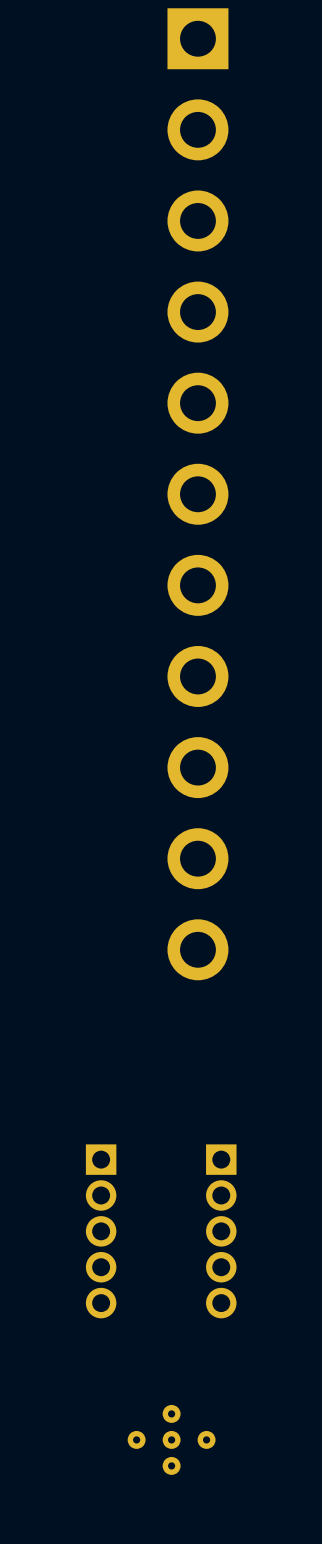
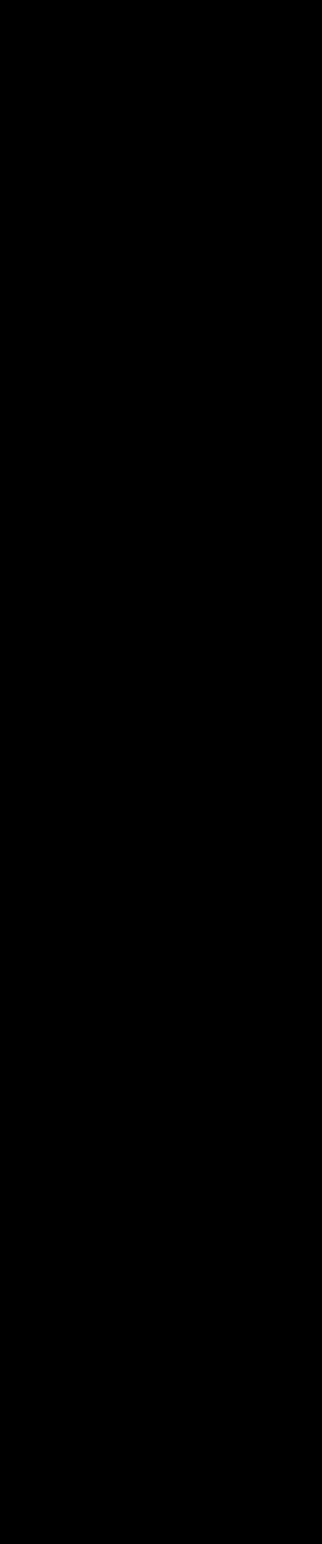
part: (197, 494) -> none
part: (101, 1231) -> none
part: (221, 1231) -> none
part: (171, 1439) -> none

